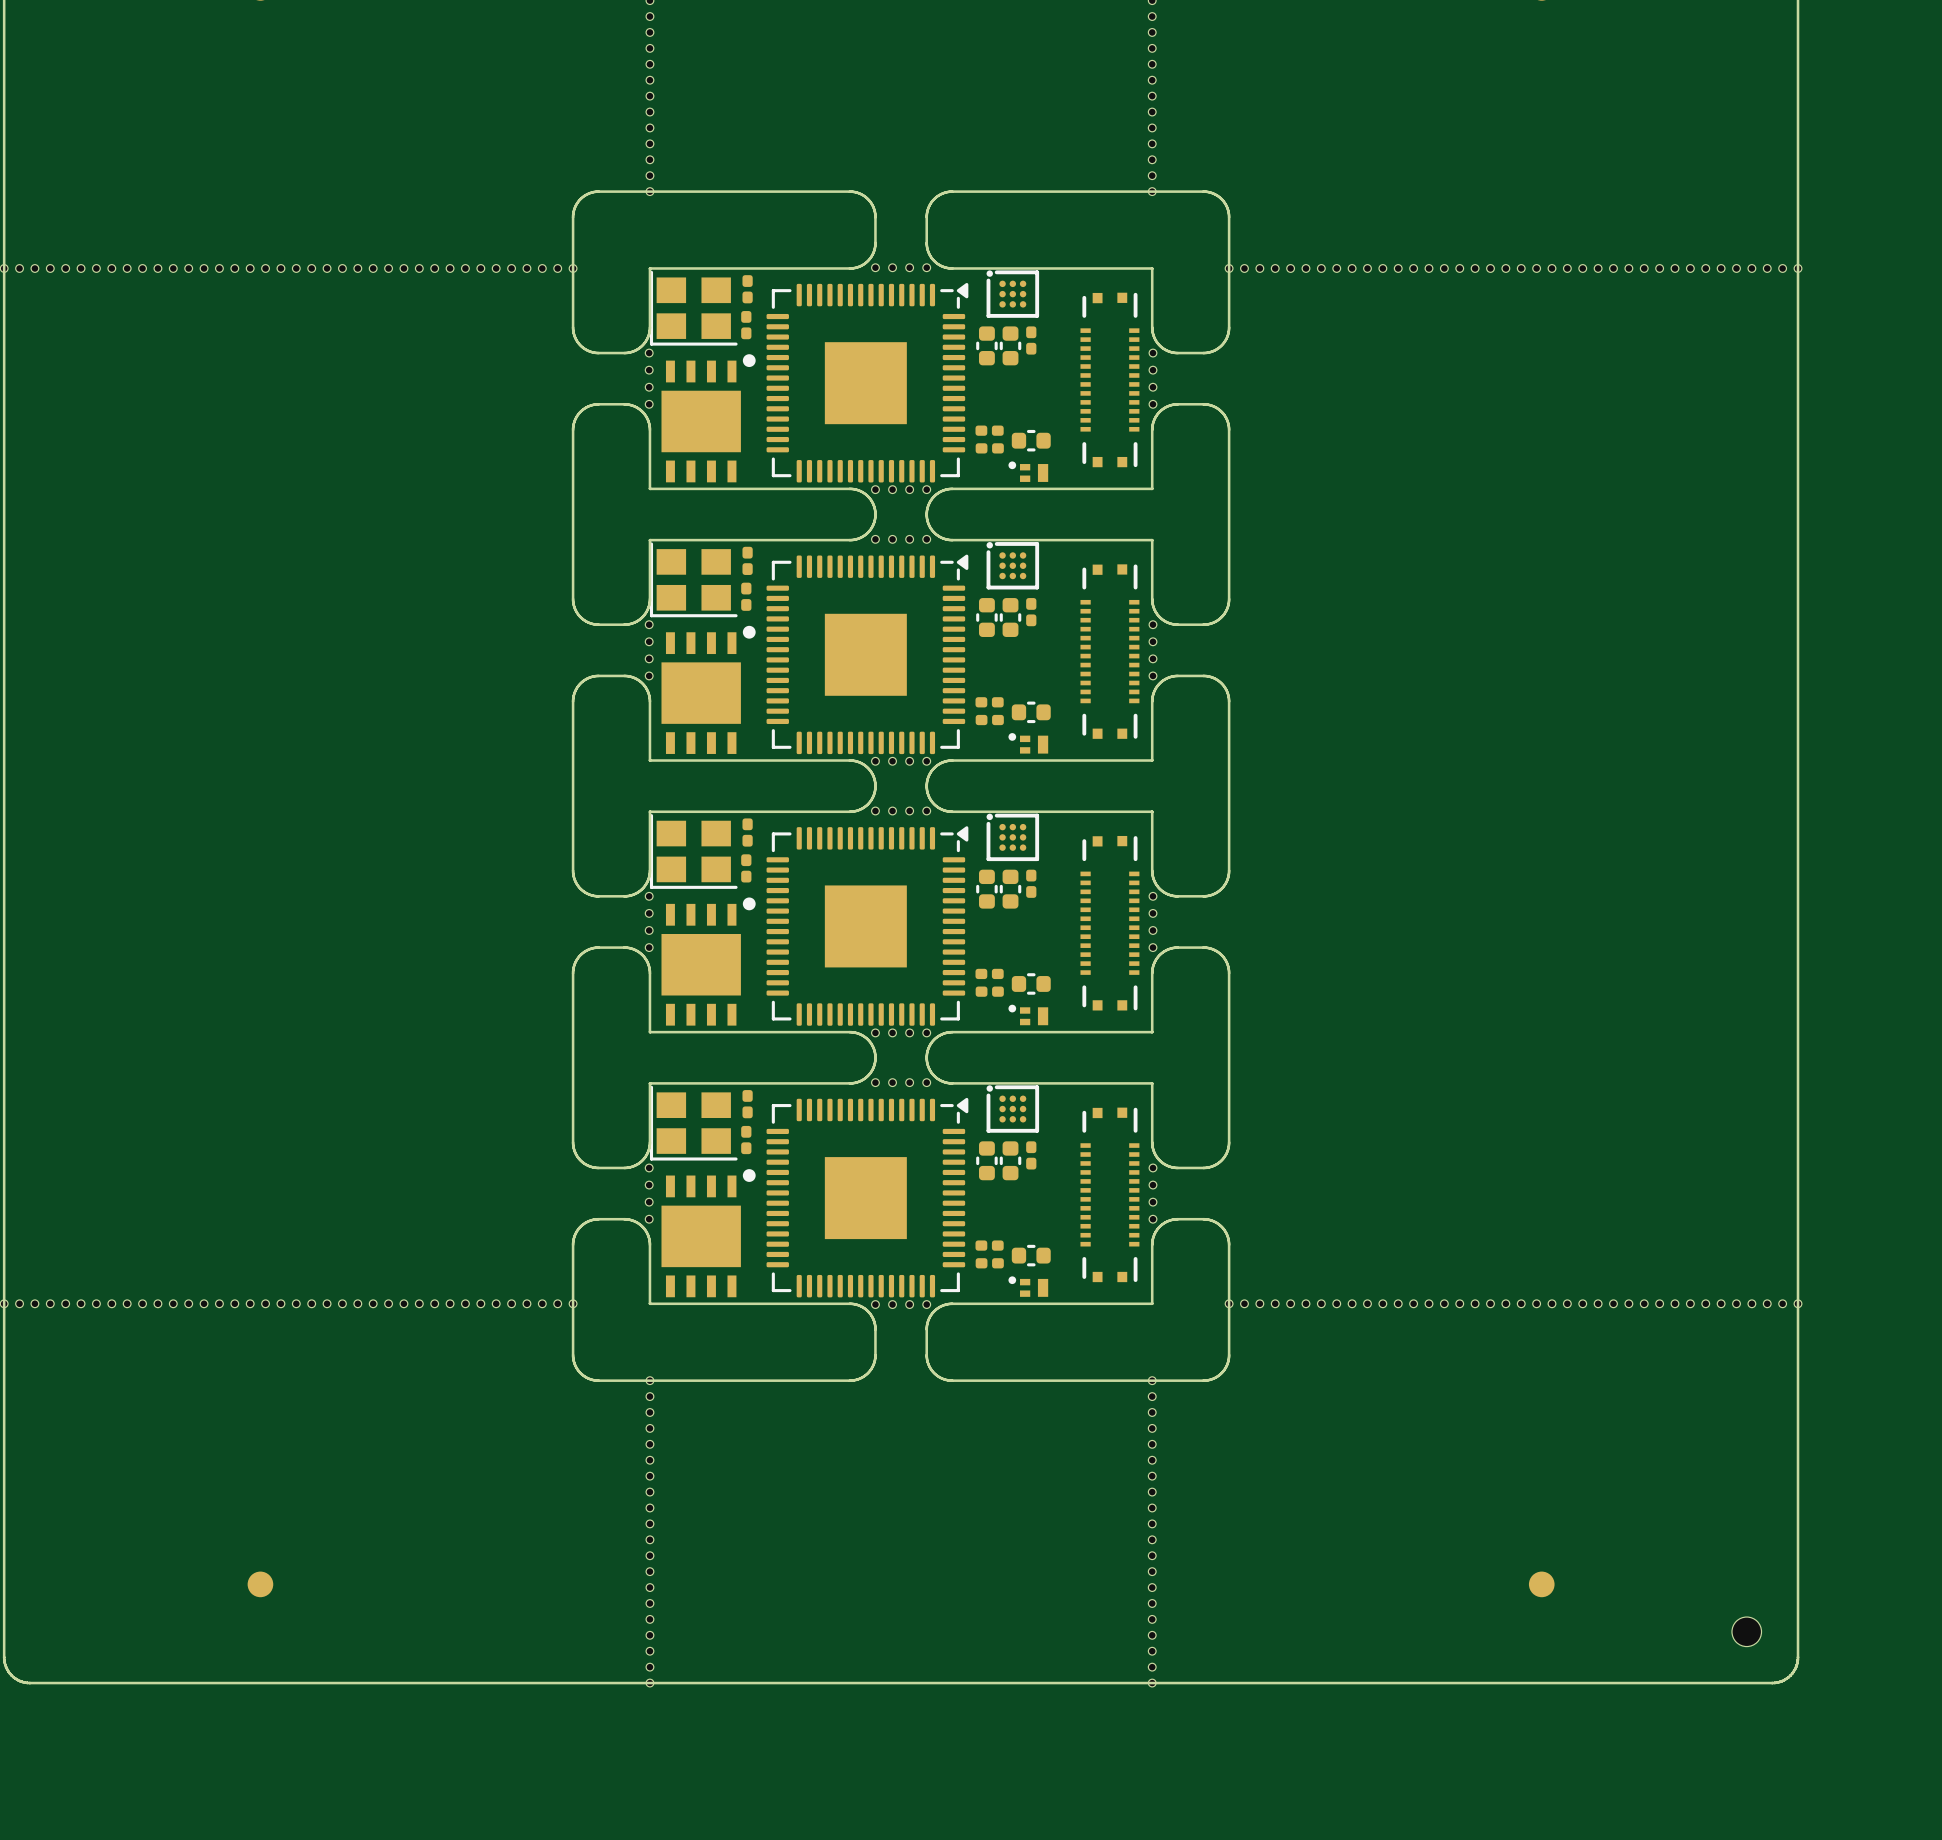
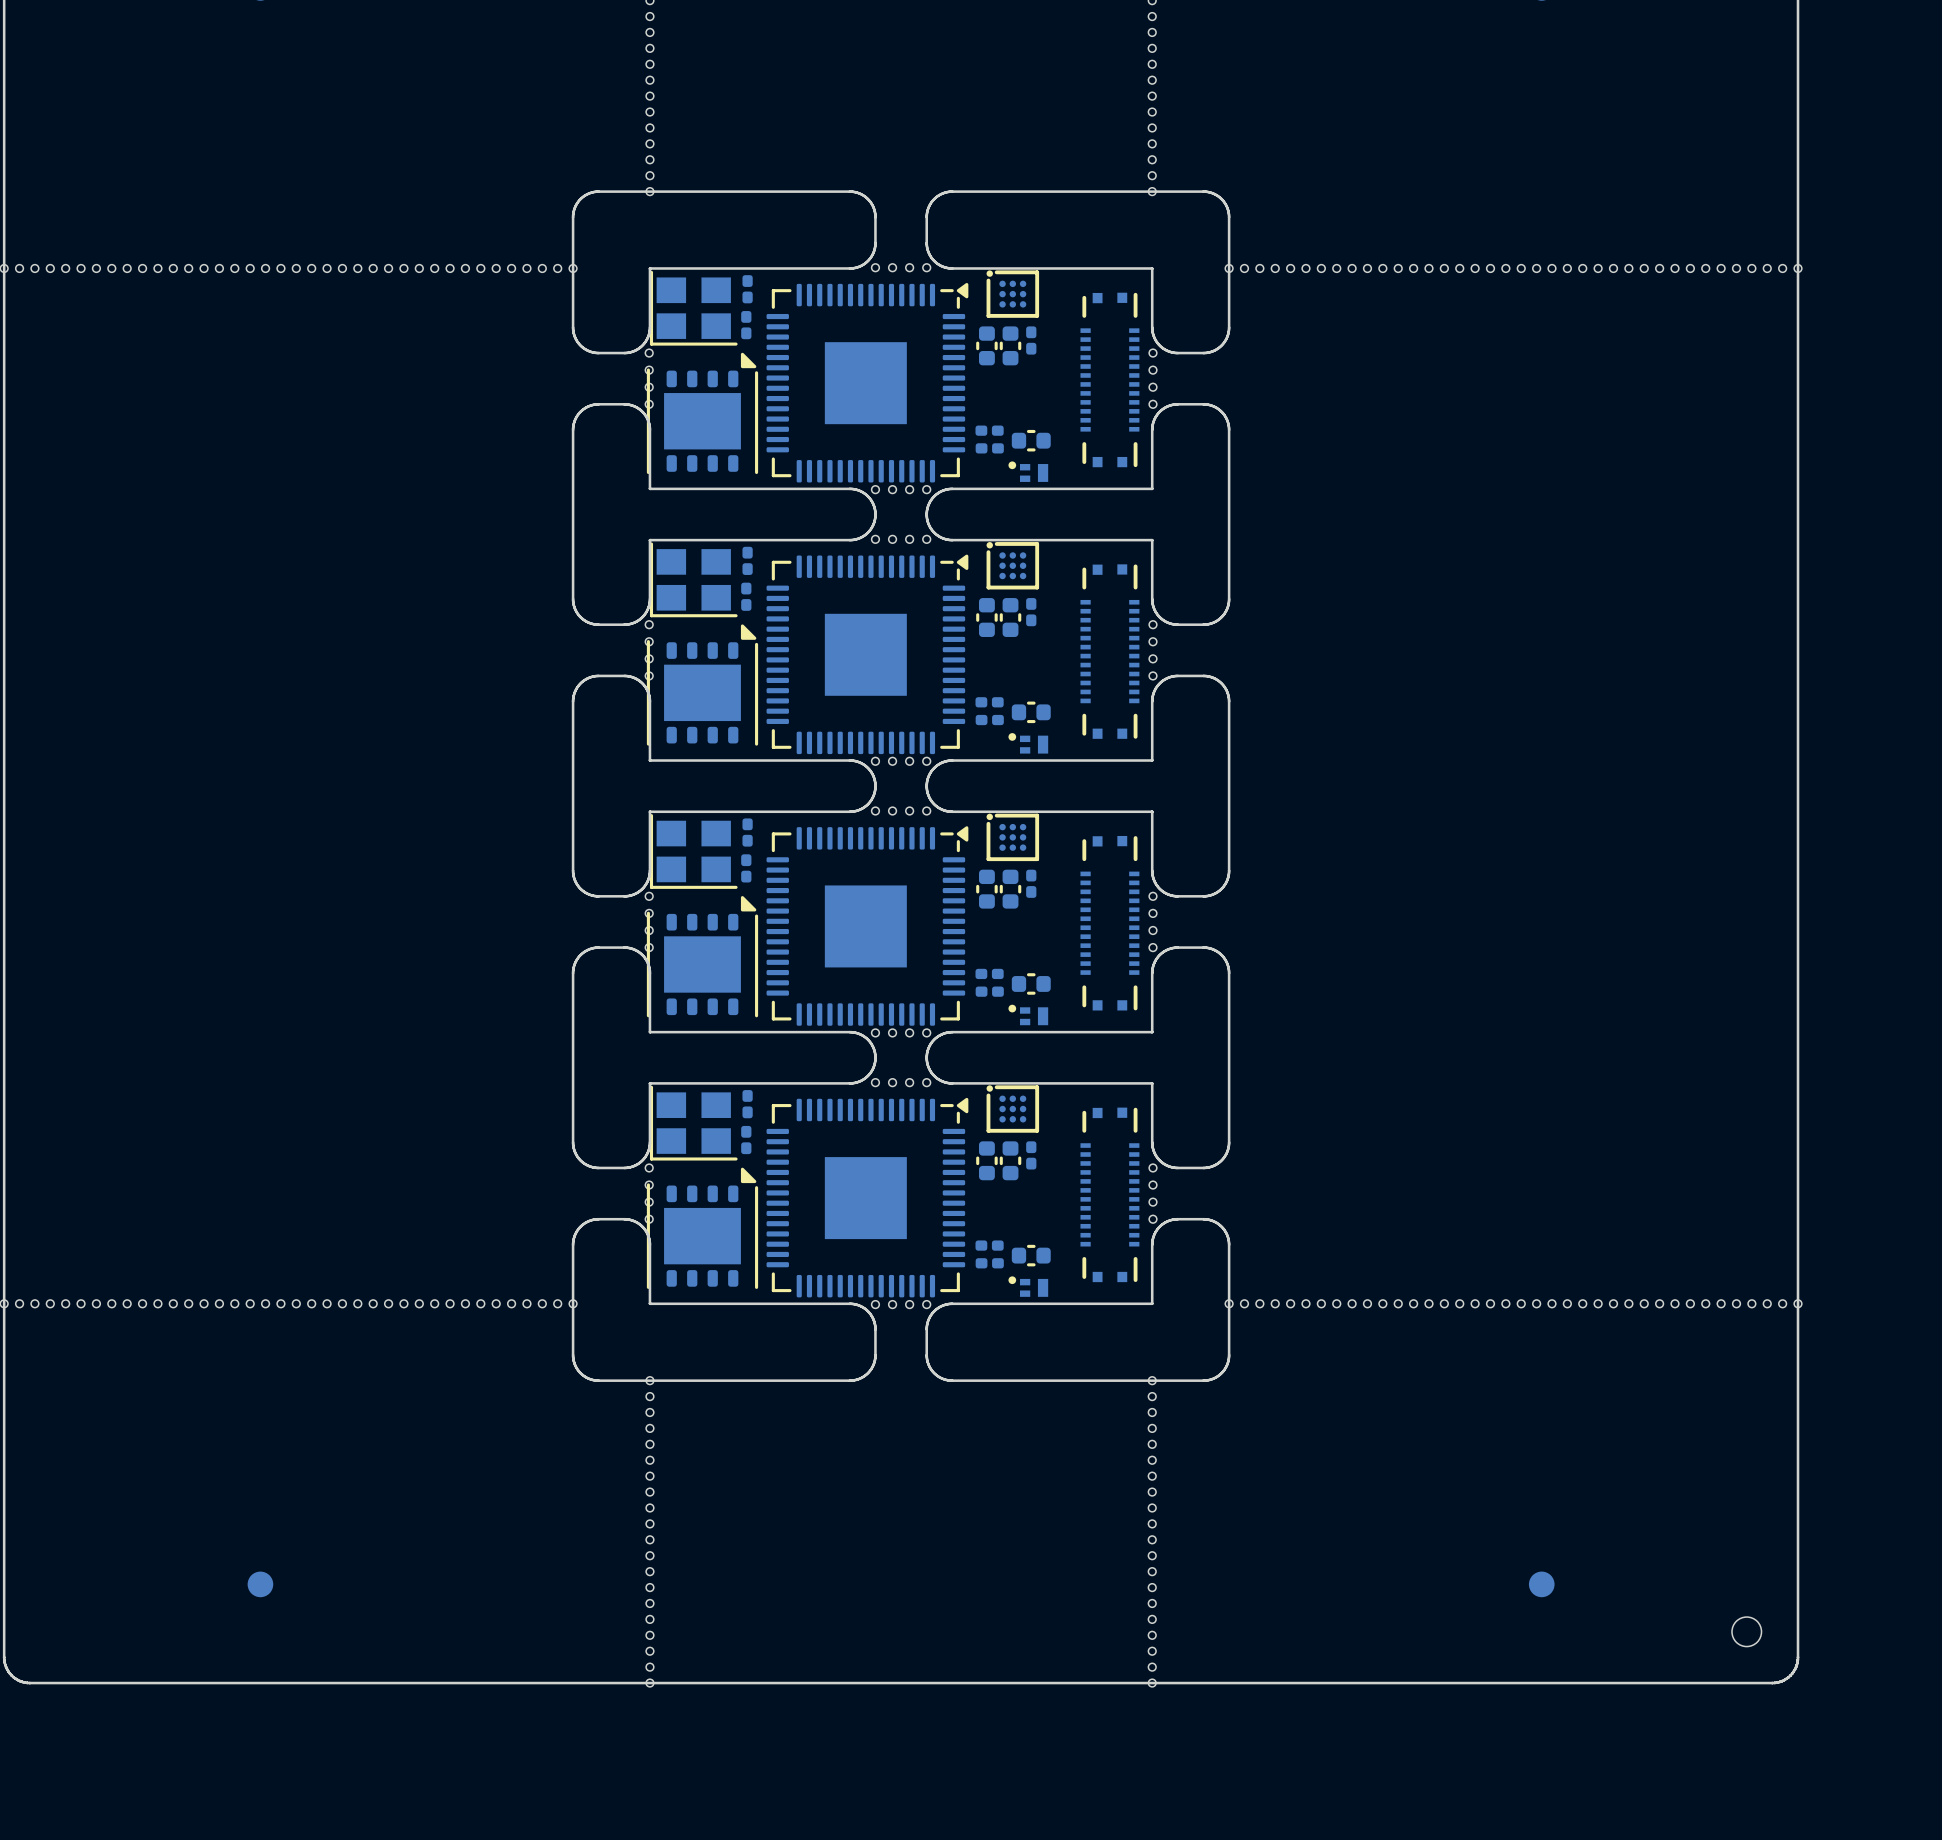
part footprint: [661, 354, 756, 483] -> [646, 352, 759, 475]
part footprint: [661, 625, 756, 754] -> [646, 624, 759, 746]
part footprint: [661, 897, 756, 1026] -> [646, 896, 759, 1018]
part footprint: [661, 1169, 756, 1298] -> [646, 1167, 759, 1289]

